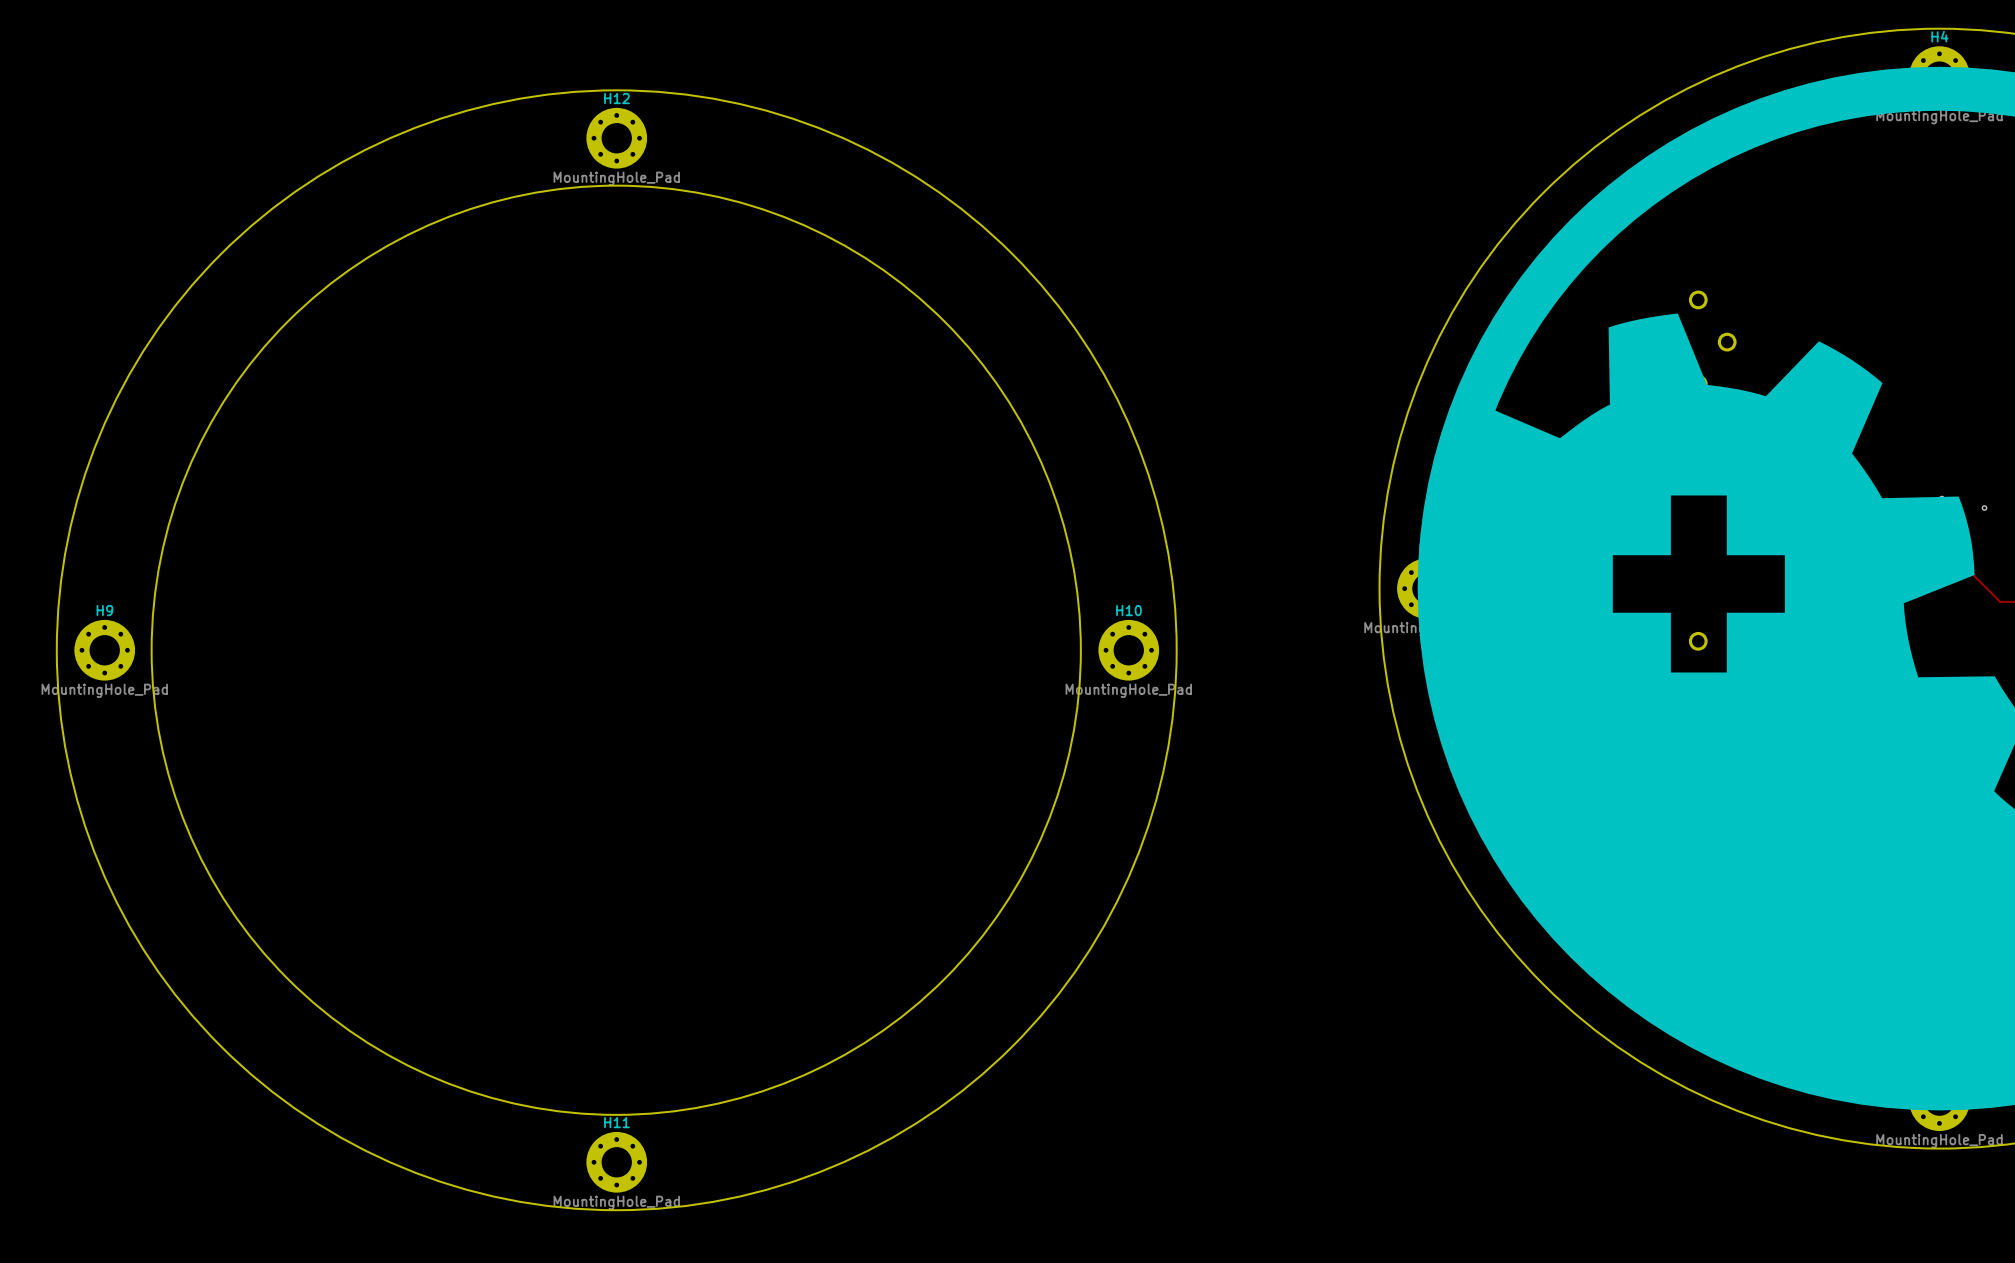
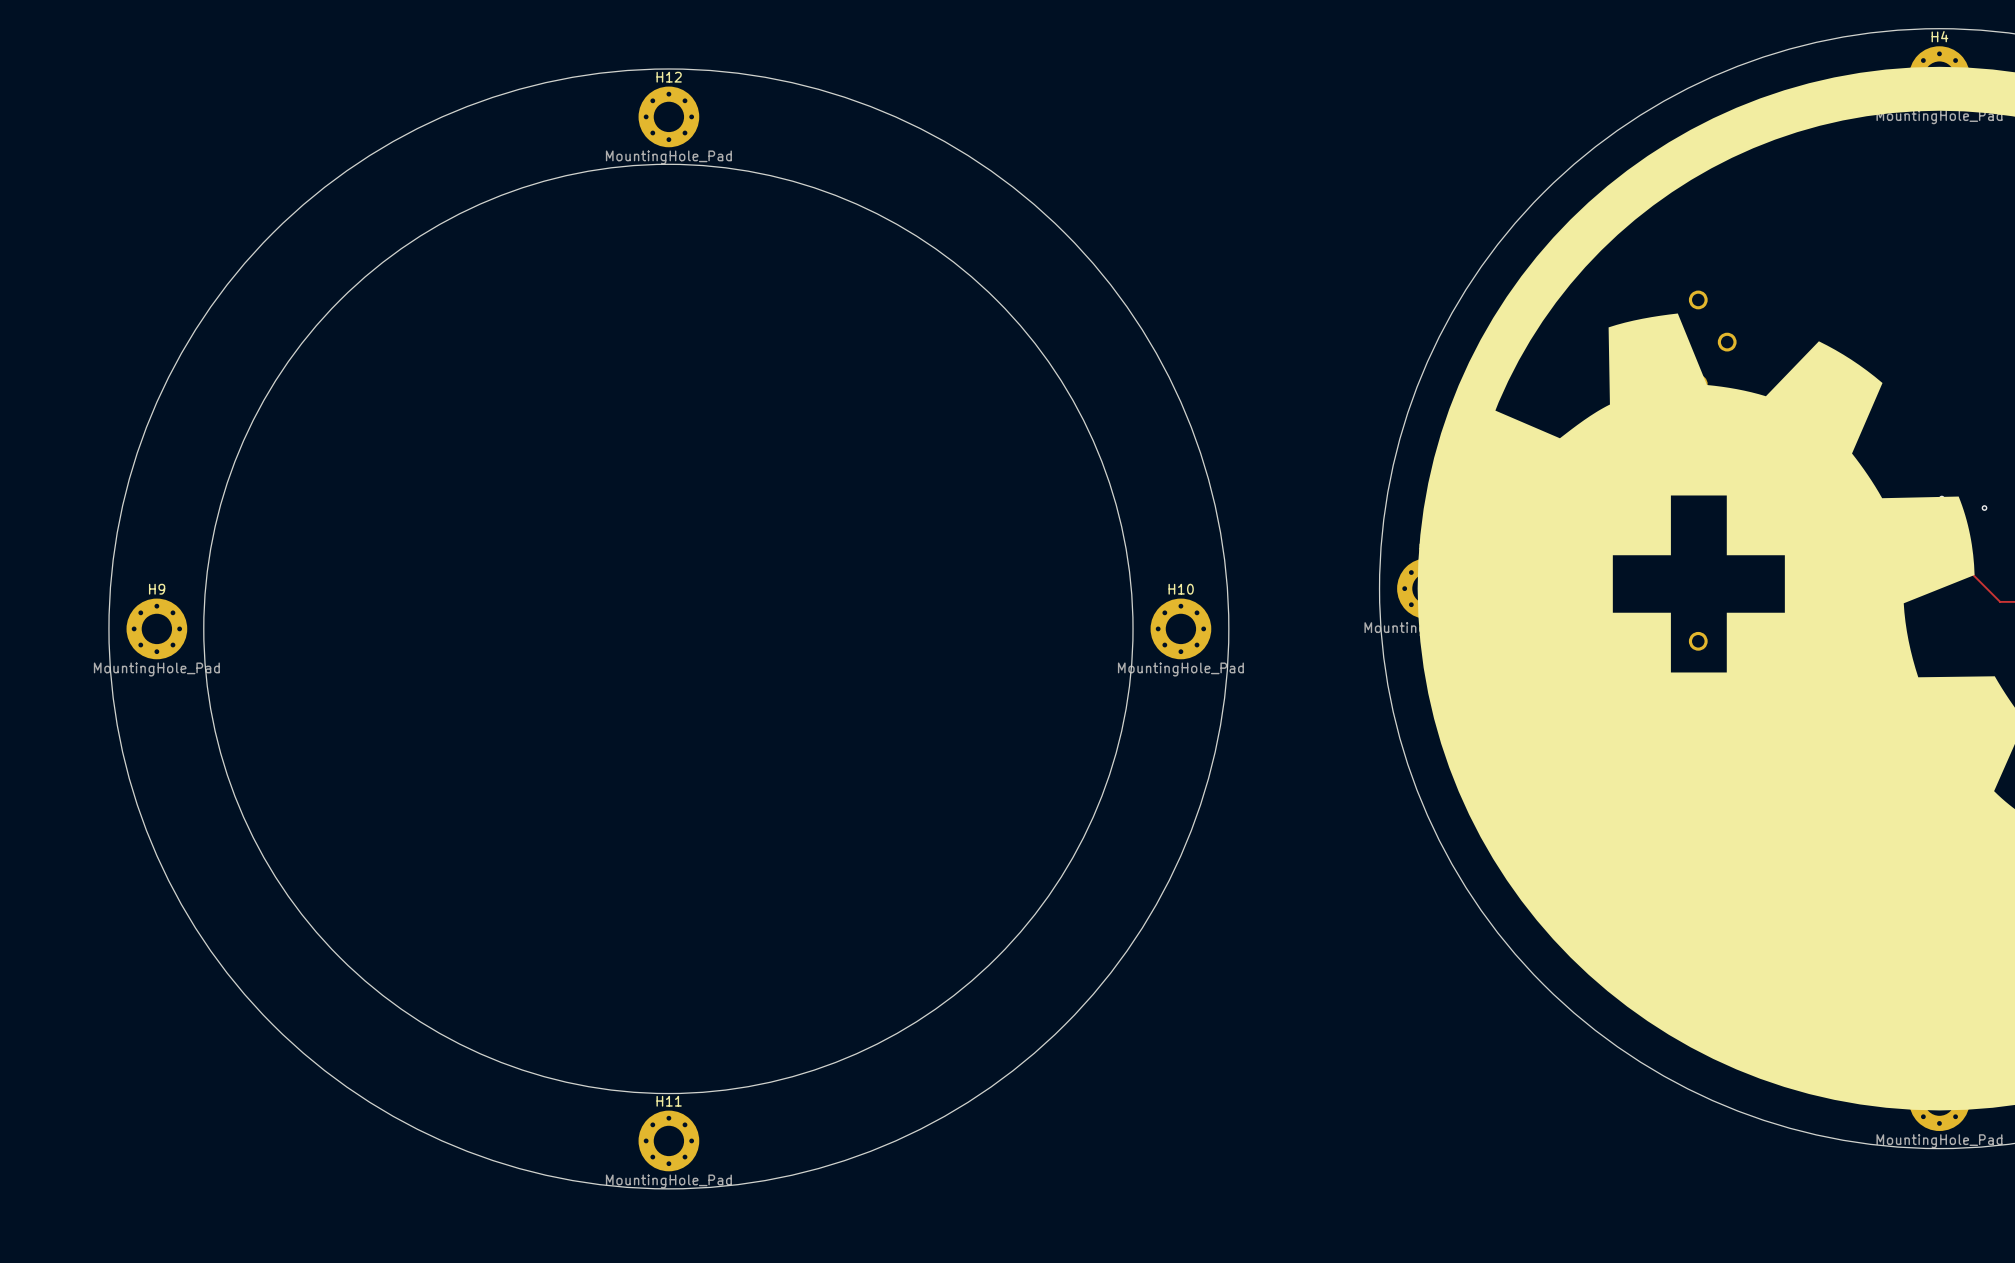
H12 position: (616, 138) -> (668, 116)
H9 position: (104, 650) -> (156, 628)
round board edge position: (616, 650) -> (668, 628)
round board edge position: (616, 650) -> (668, 628)
H10 position: (1128, 650) -> (1180, 628)
H11 position: (616, 1162) -> (668, 1140)

